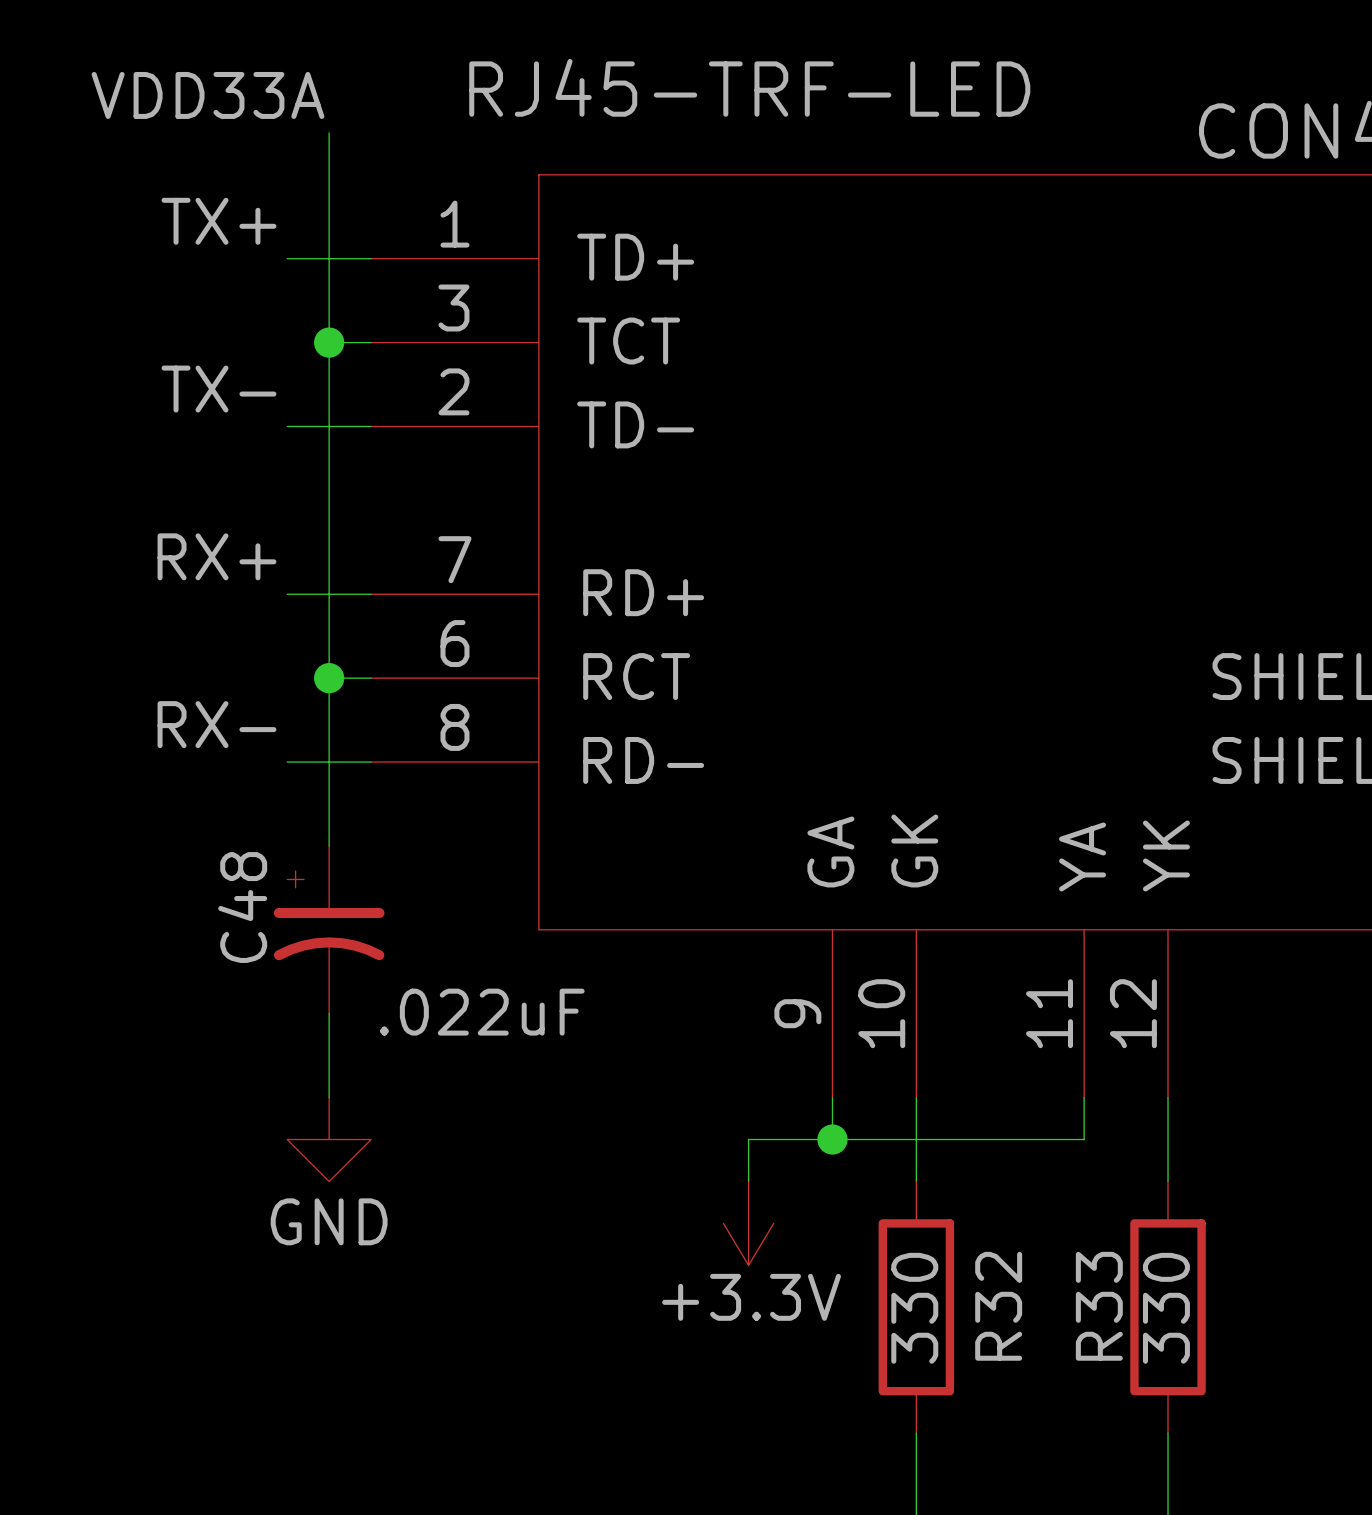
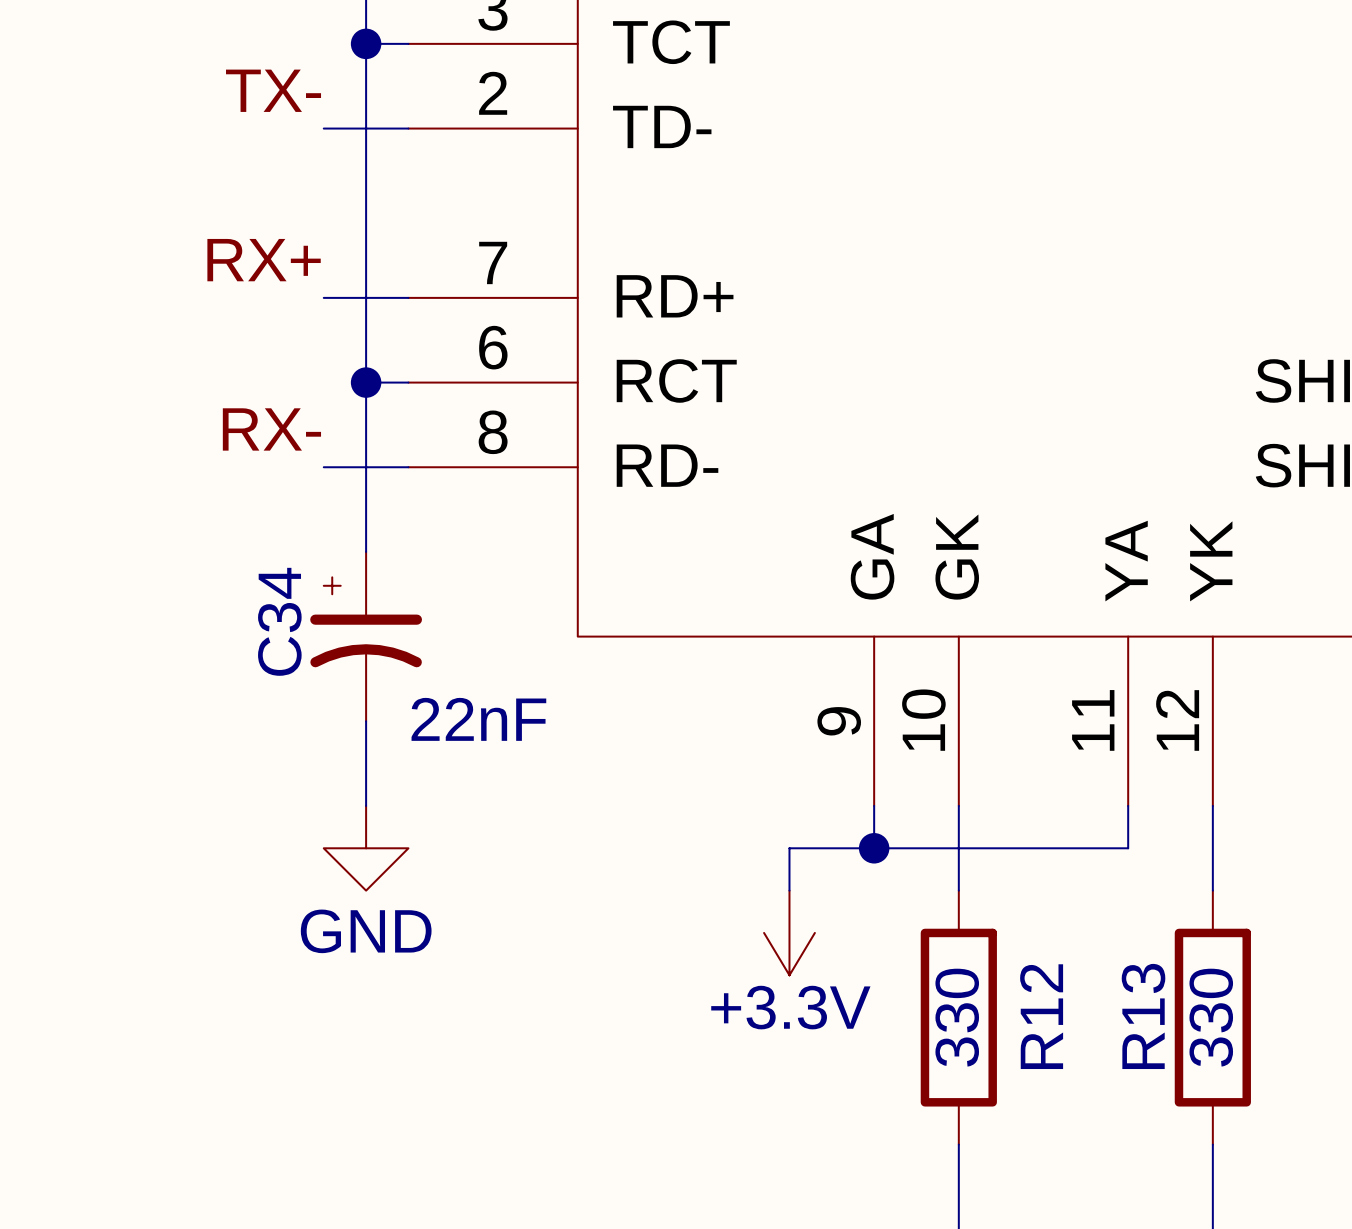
C48 name: C48 (242, 907) -> C34 (279, 621)
C48 value: .022uF (482, 1012) -> 22nF (478, 719)
R32 name: R32 (998, 1306) -> R12 (1041, 1016)
R33 name: R33 (1099, 1306) -> R13 (1143, 1016)

